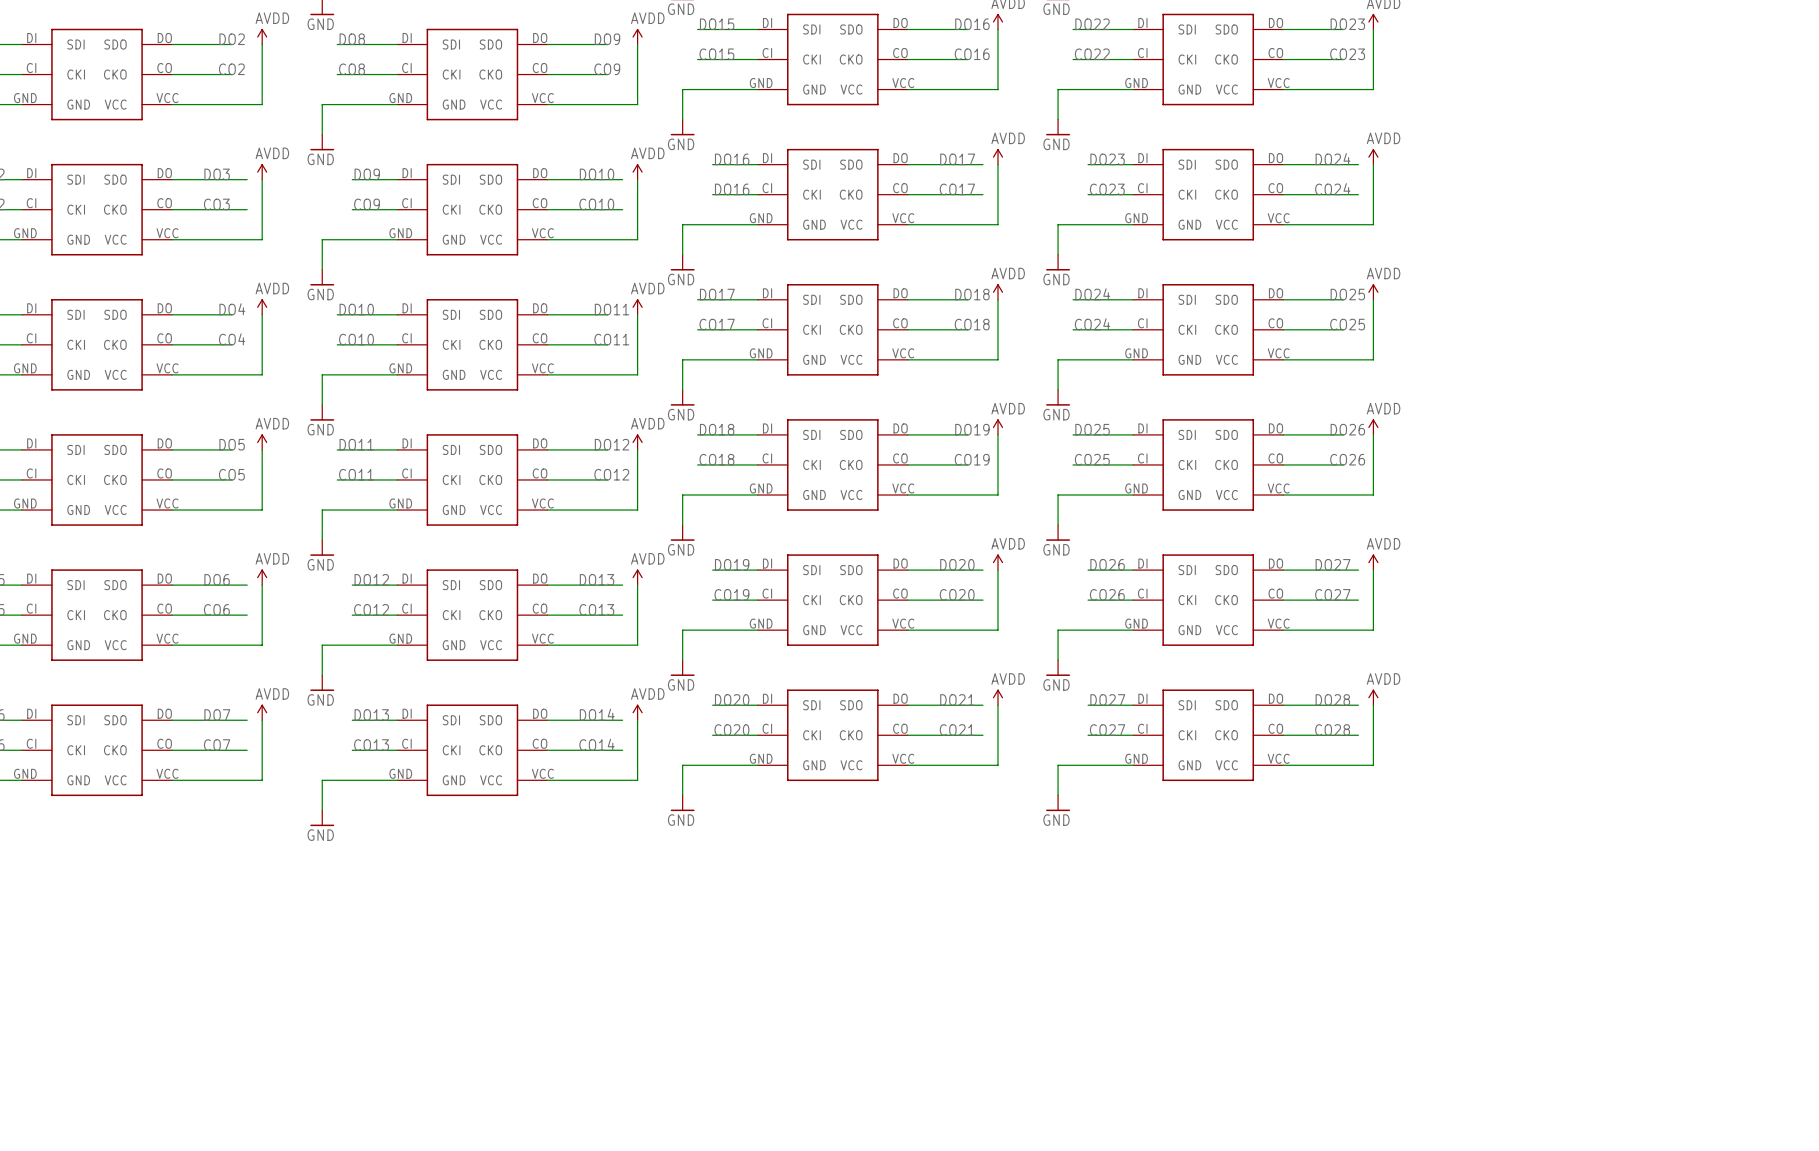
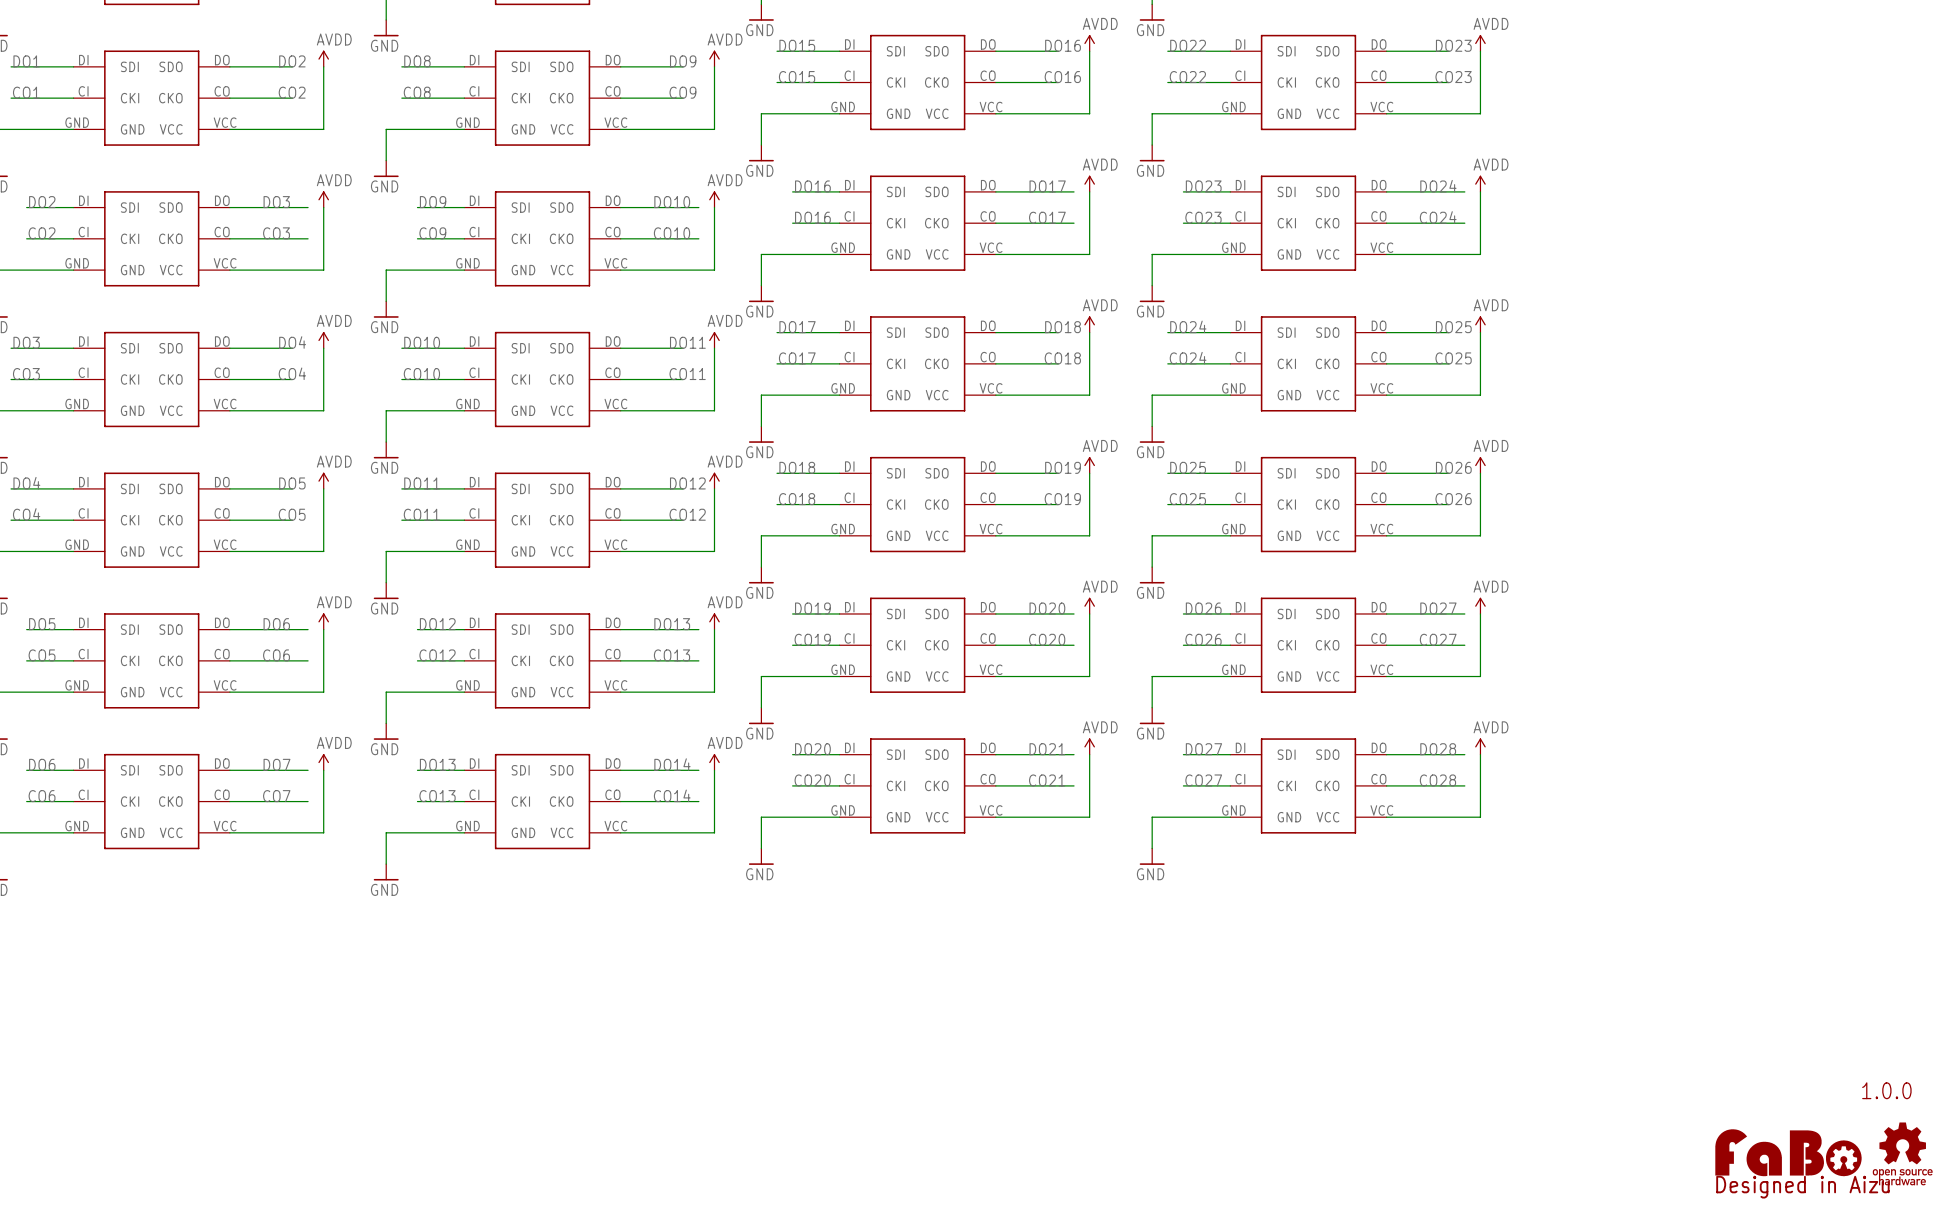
text: none -> 1.0.0 (1886, 1090)
part: none -> (1788, 1152)
part: none -> (1902, 1153)

